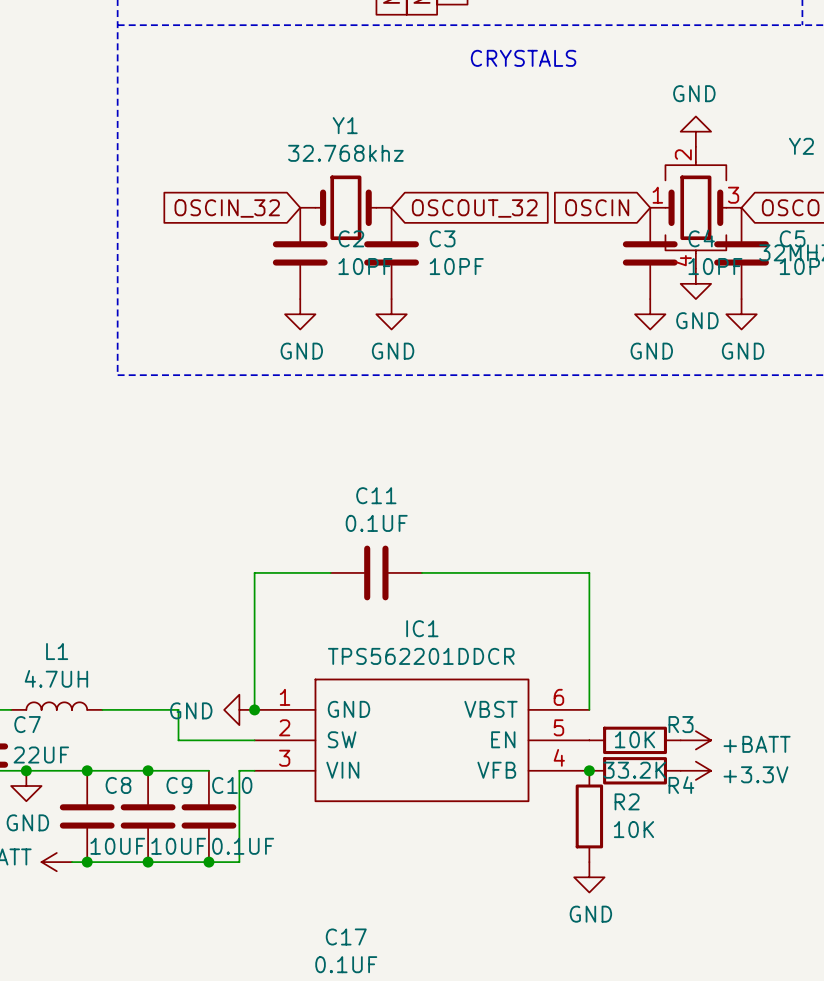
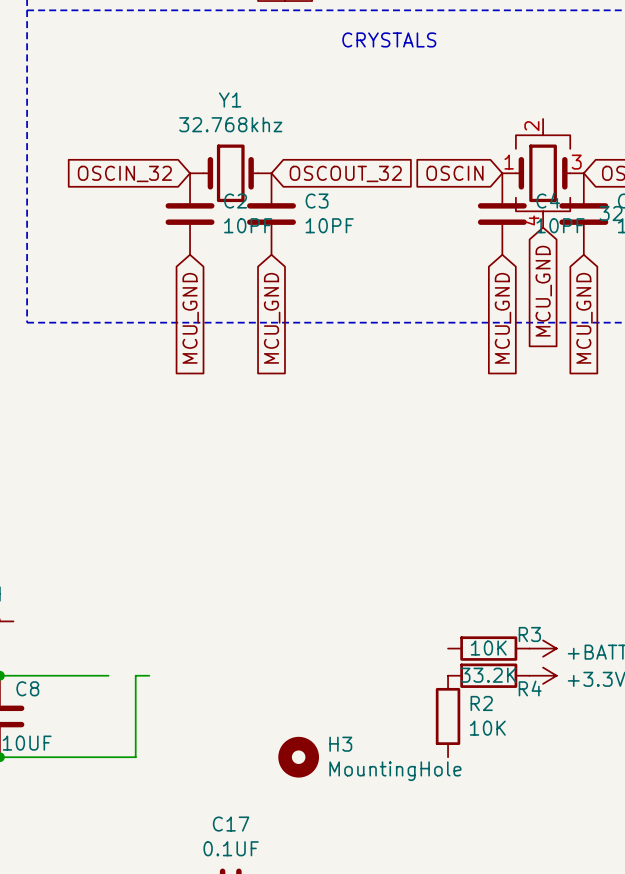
power symbol: GND (695, 131) -> none
power symbol: GND (695, 283) -> none
power symbol: GND (300, 314) -> none
power symbol: GND (391, 314) -> none
power symbol: GND (650, 314) -> none
power symbol: GND (741, 314) -> none
global label: none -> MCU_GND (543, 291)
global label: none -> MCU_GND (190, 318)
global label: none -> MCU_GND (272, 318)
global label: none -> MCU_GND (503, 318)
global label: none -> MCU_GND (584, 318)
wire: (330, 572) (254, 572) (254, 709) -> none
C11: 0.1UF (376, 572) -> none
wire: (421, 572) (589, 572) (589, 709) -> none
wire: (102, 709) (178, 709) (178, 740) (254, 740) -> none
power symbol: GND (239, 709) -> none
junction: (254, 709) -> none
IC1: TPS562201DDCR (421, 740) -> none
junction: (148, 770) -> none
junction: (589, 770) -> none
C9: 10UF (148, 816) -> none
C10: 0.1UF (208, 816) -> none
junction: (148, 862) -> none
junction: (208, 862) -> none
H3: none -> MountingHole (298, 757)
power symbol: GND (589, 877) -> none

